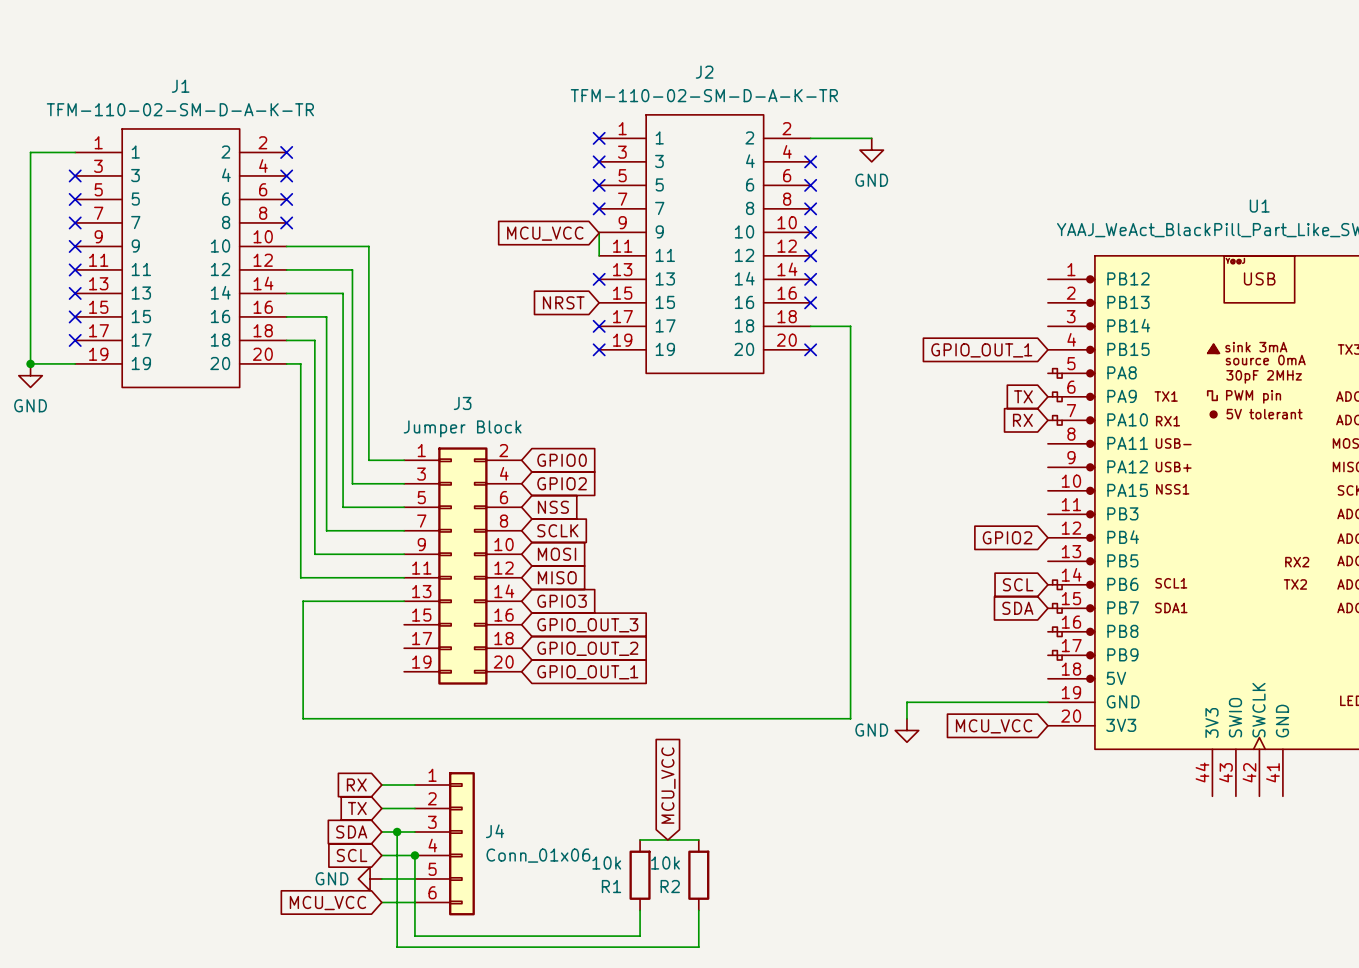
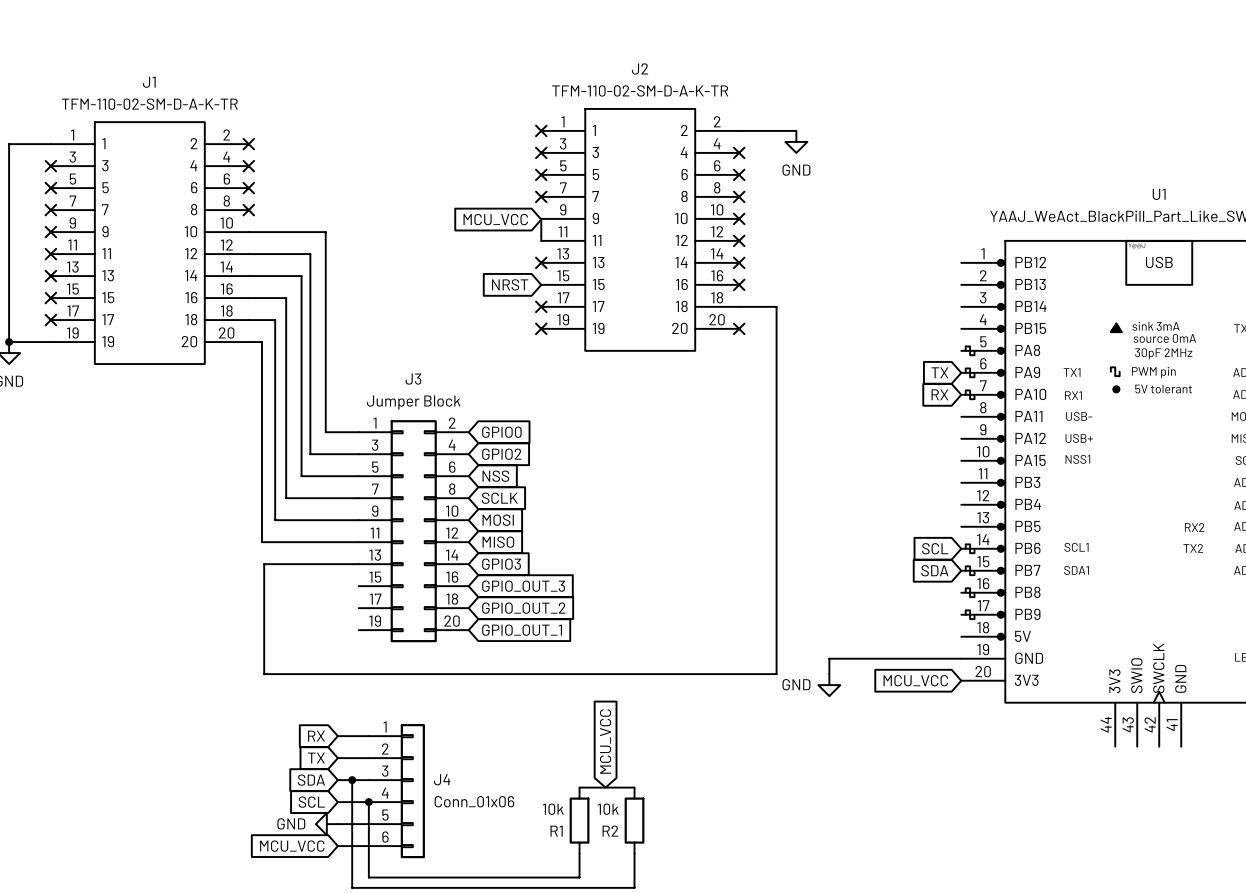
global label: GPIO_OUT_1 (981, 350) -> none
global label: GPIO2 (1007, 537) -> none

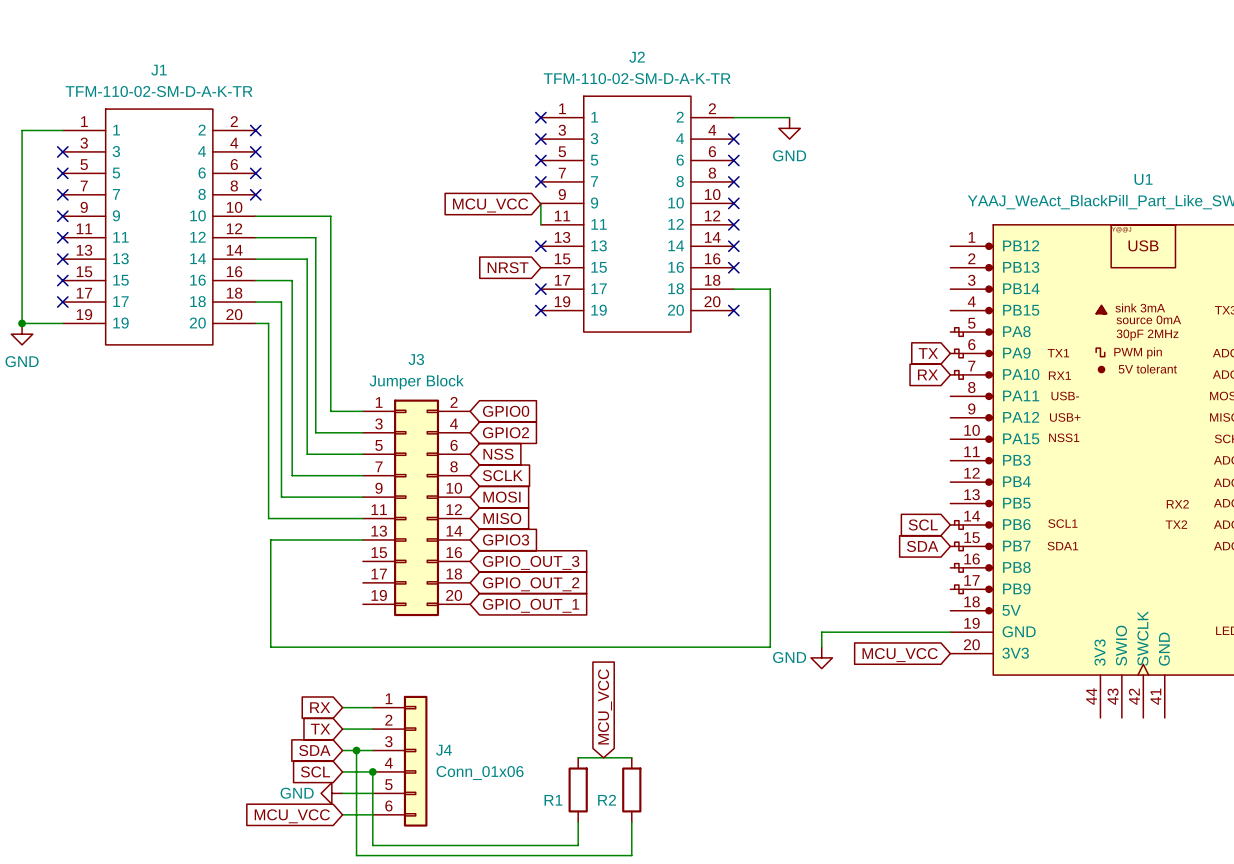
R1 value: 10k (553, 809) -> none
R2 value: 10k (608, 809) -> none

